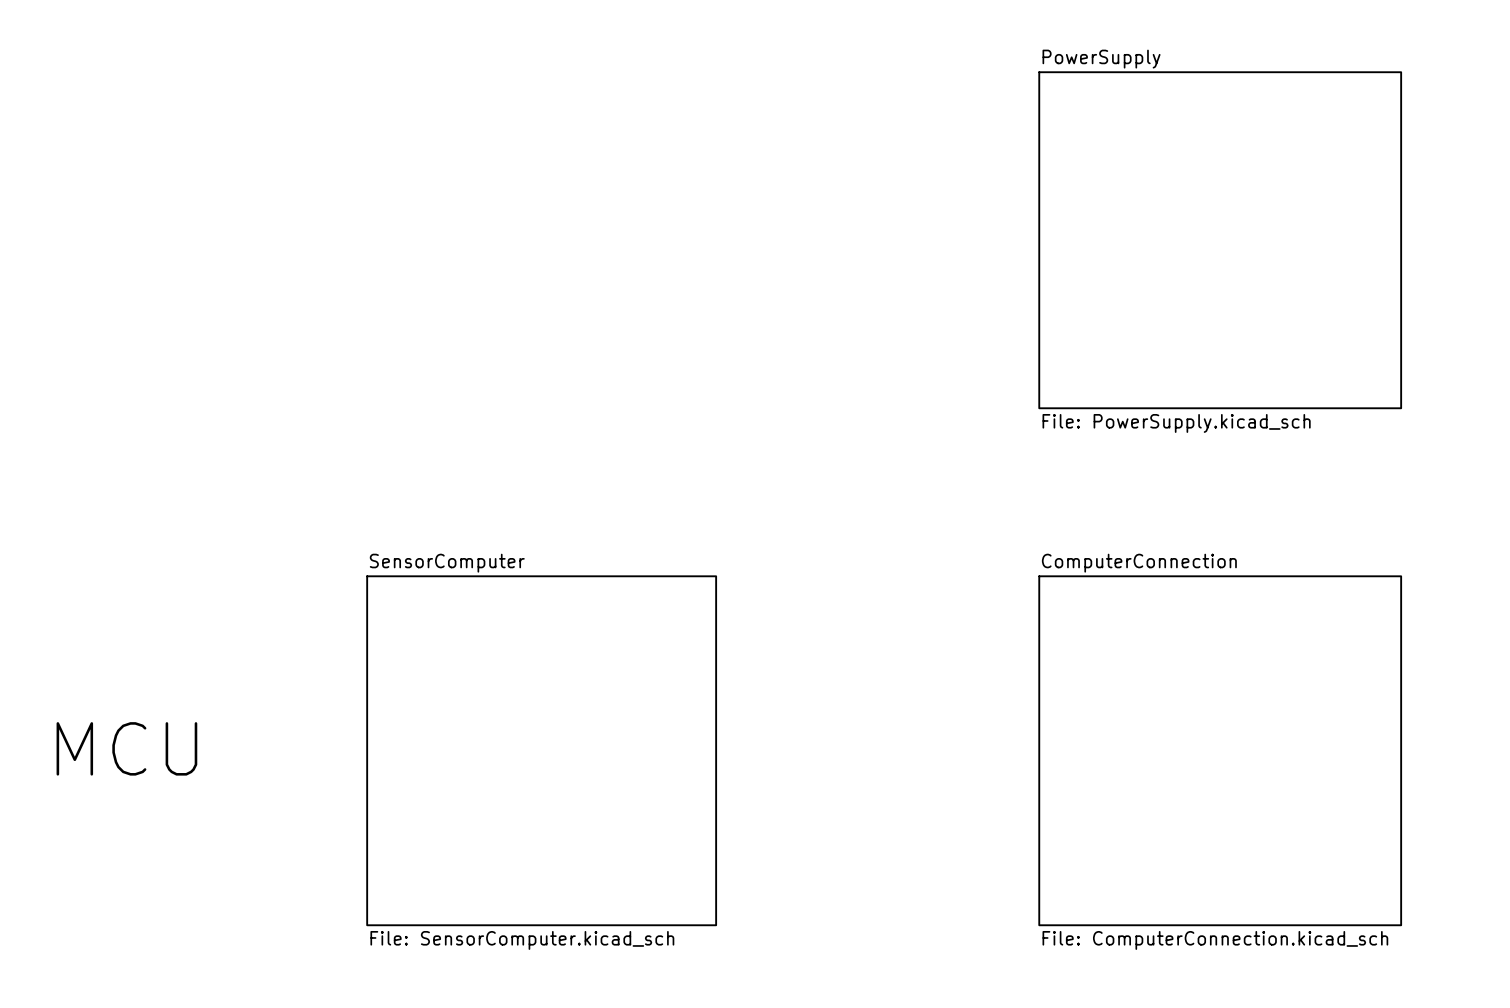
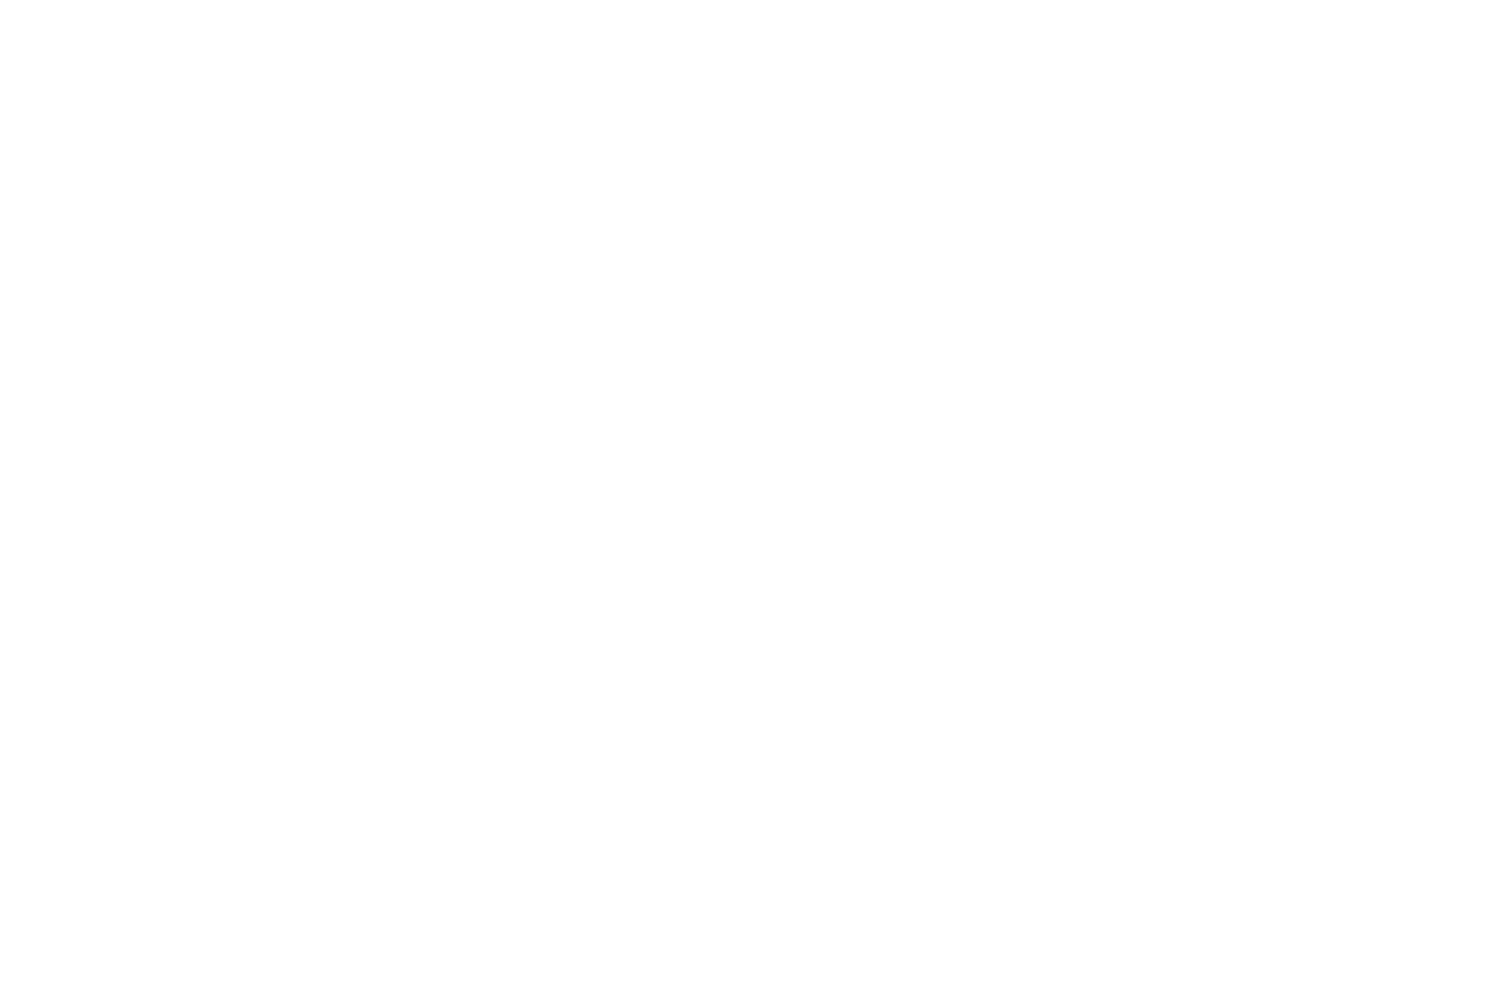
sheet PowerSupply: File: PowerSupply.kicad_sch (1220, 240) -> none
text: MCU (126, 748) -> none
sheet SensorComputer: File: SensorComputer.kicad_sch (541, 750) -> none
sheet ComputerConnection: File: ComputerConnection.kicad_sch (1220, 750) -> none

